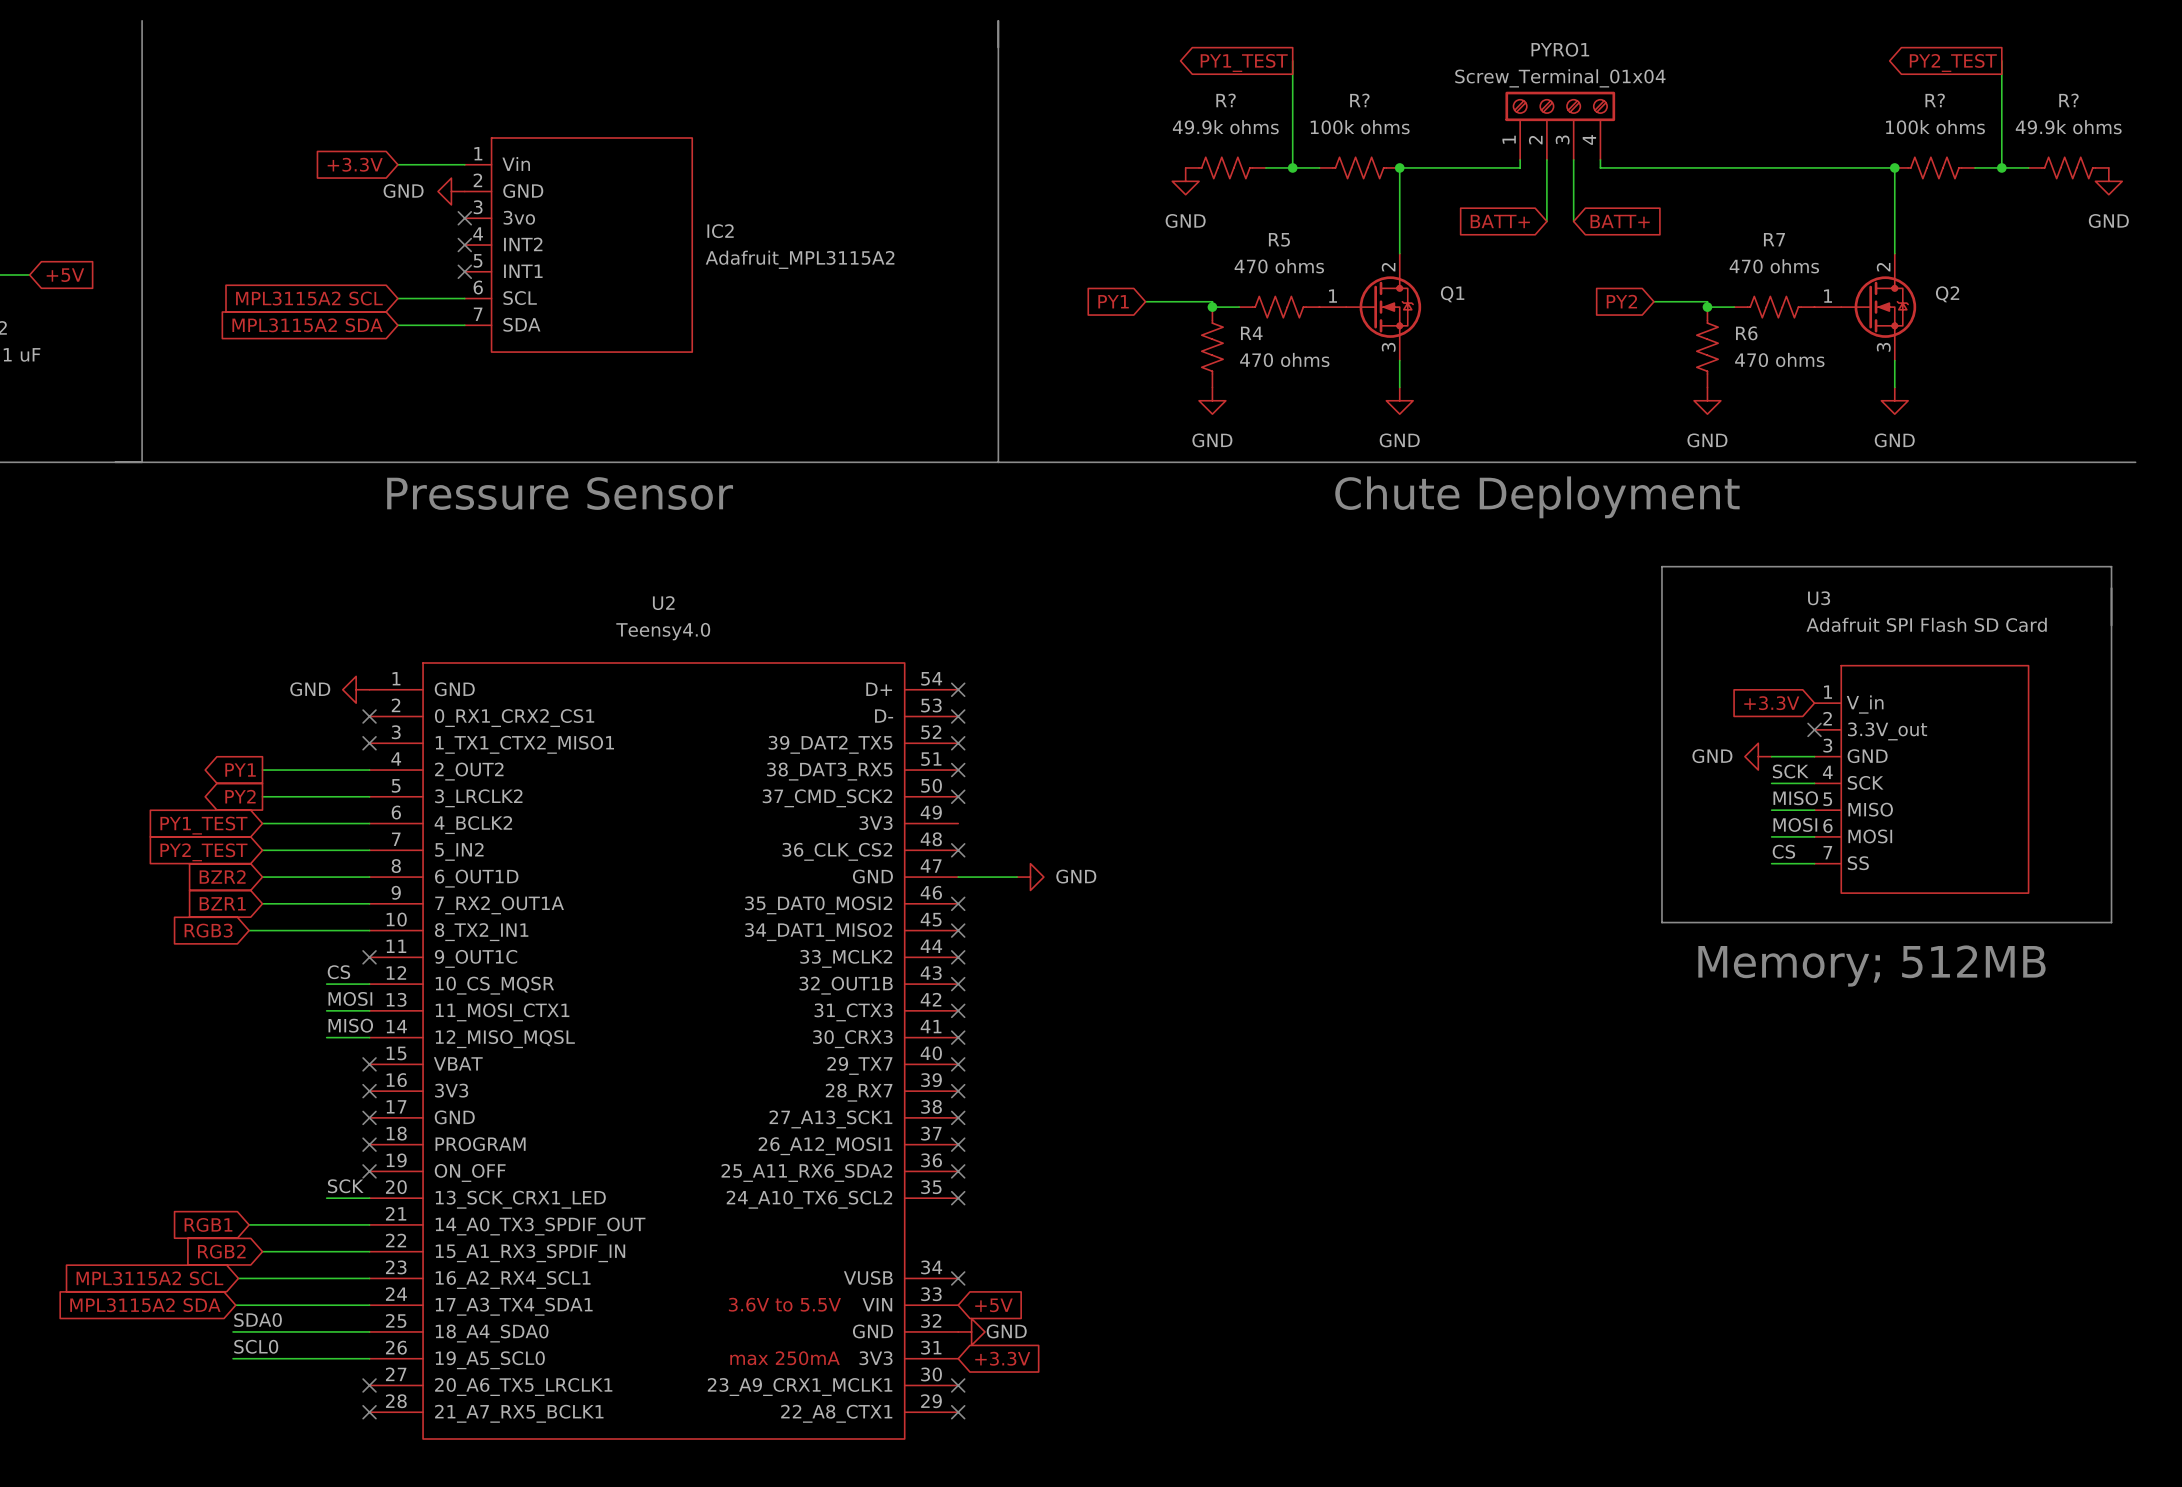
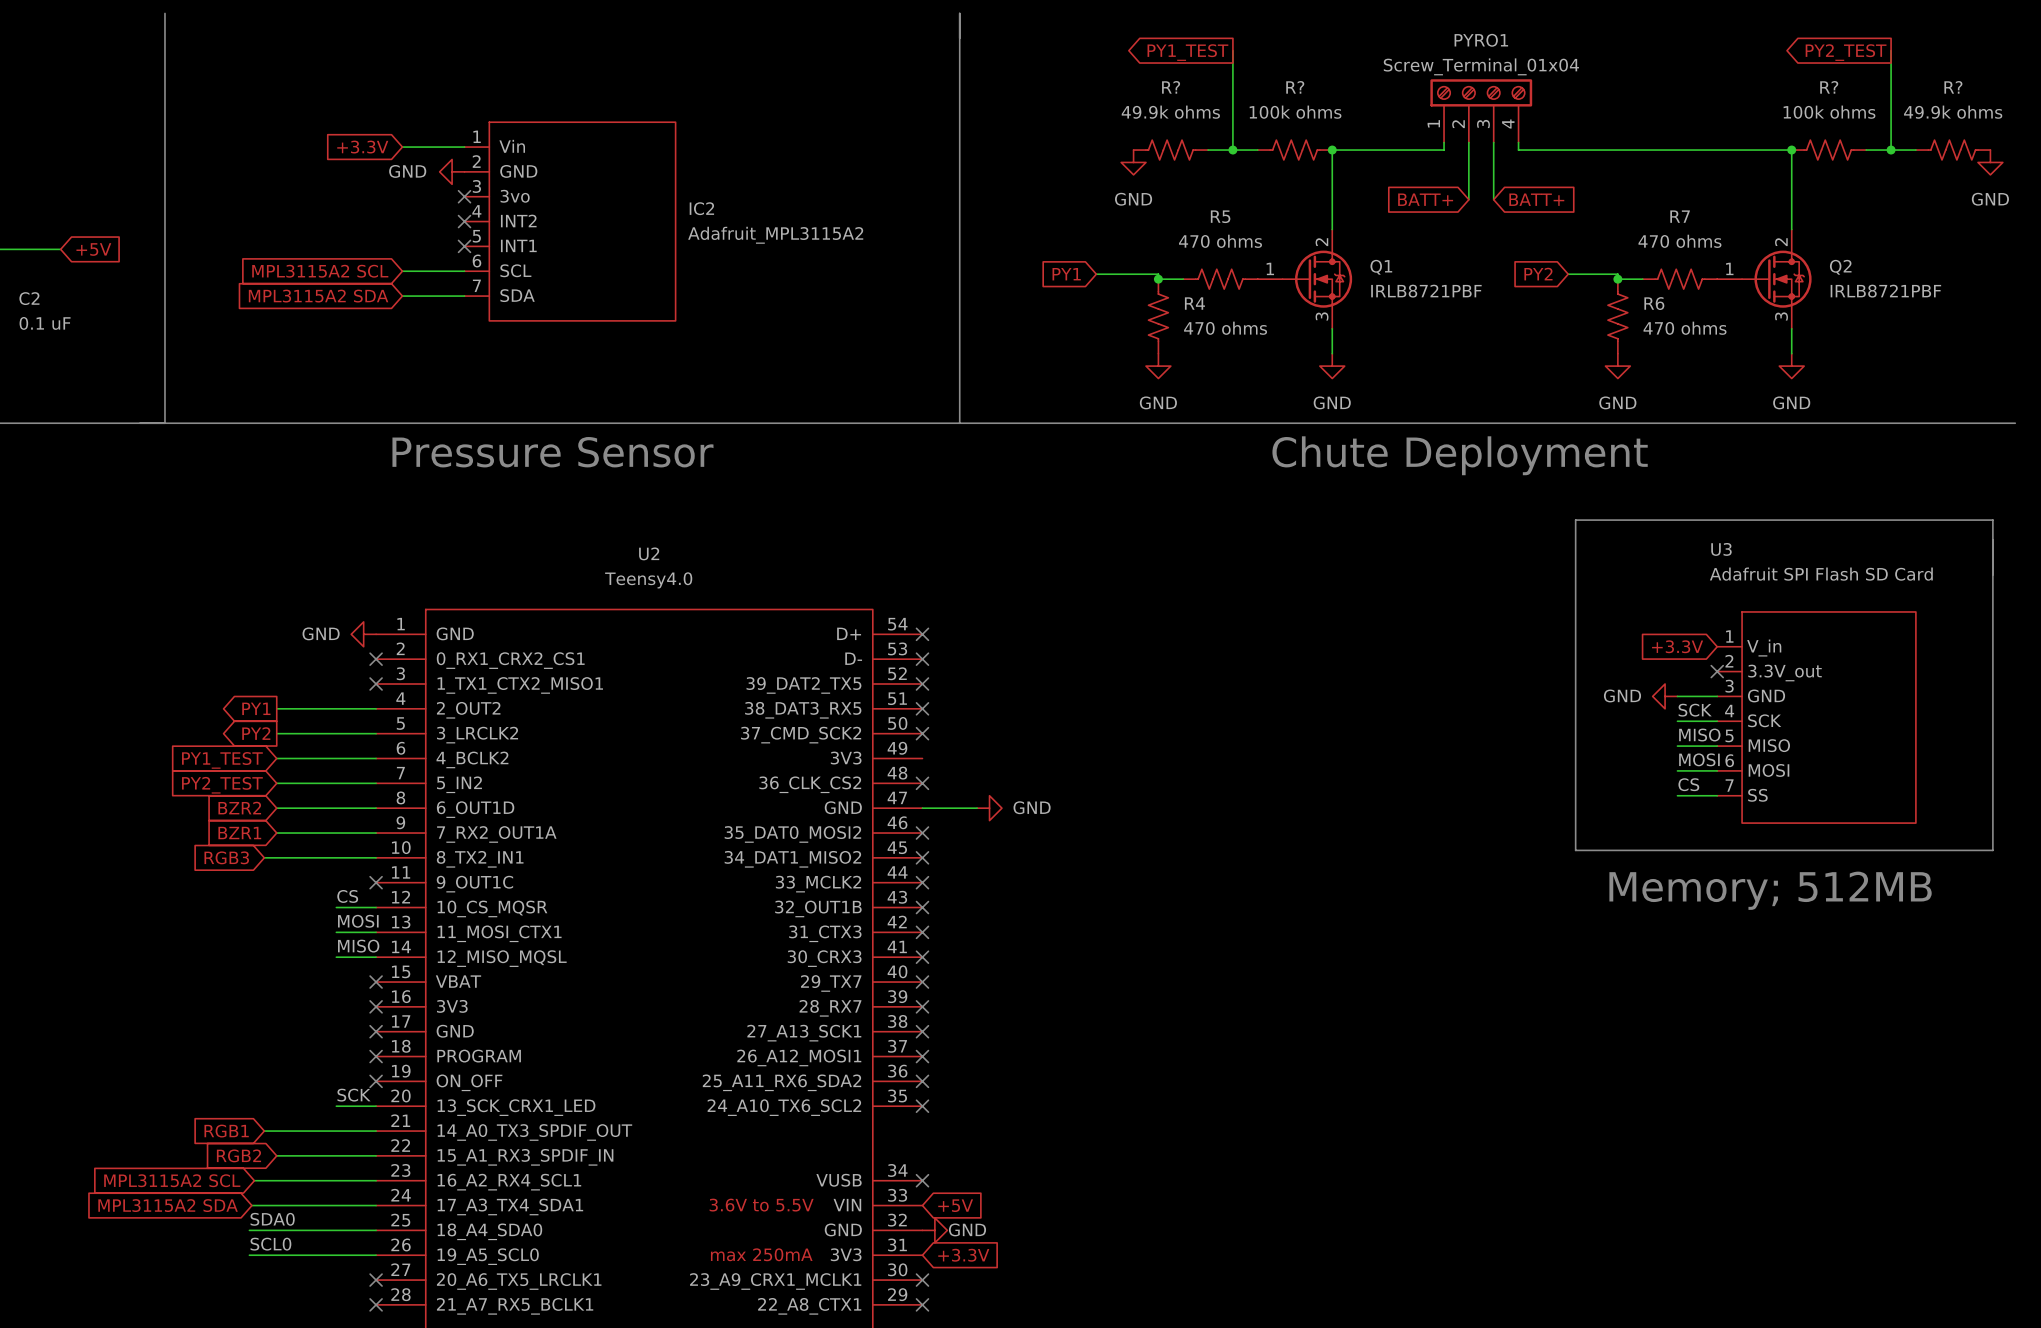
Q1 value: none -> IRLB8721PBF (1426, 291)
Q2 value: none -> IRLB8721PBF (1885, 291)

